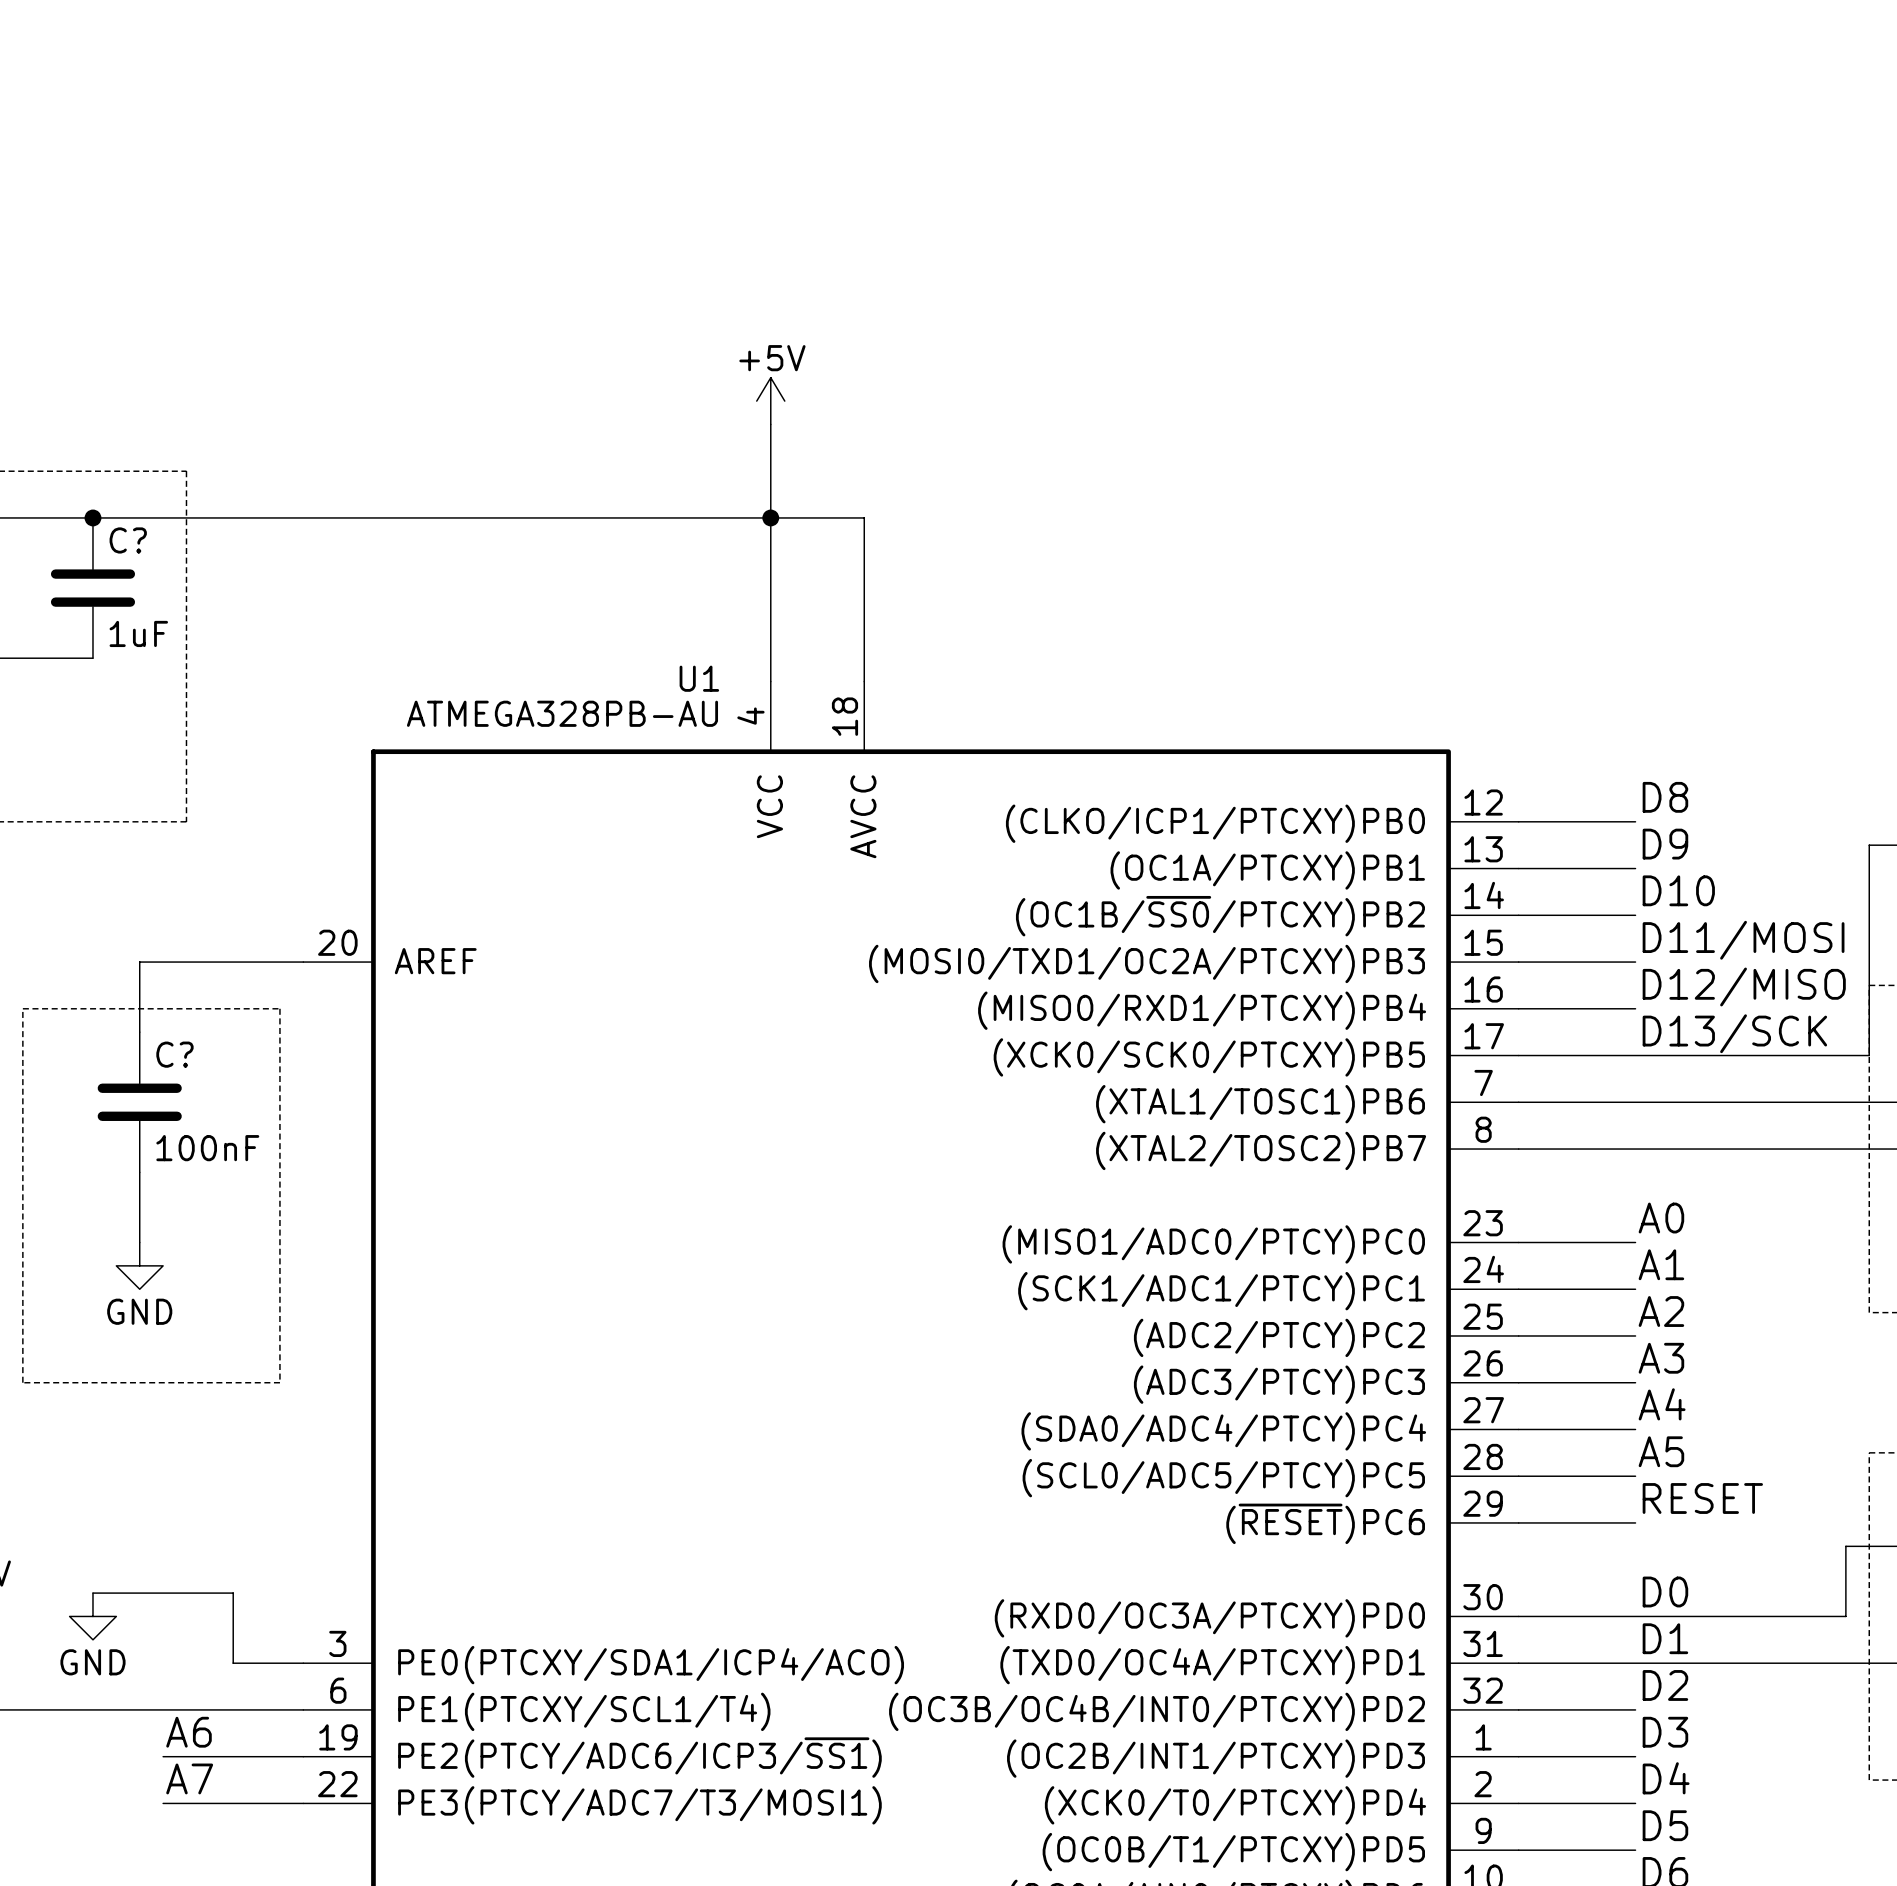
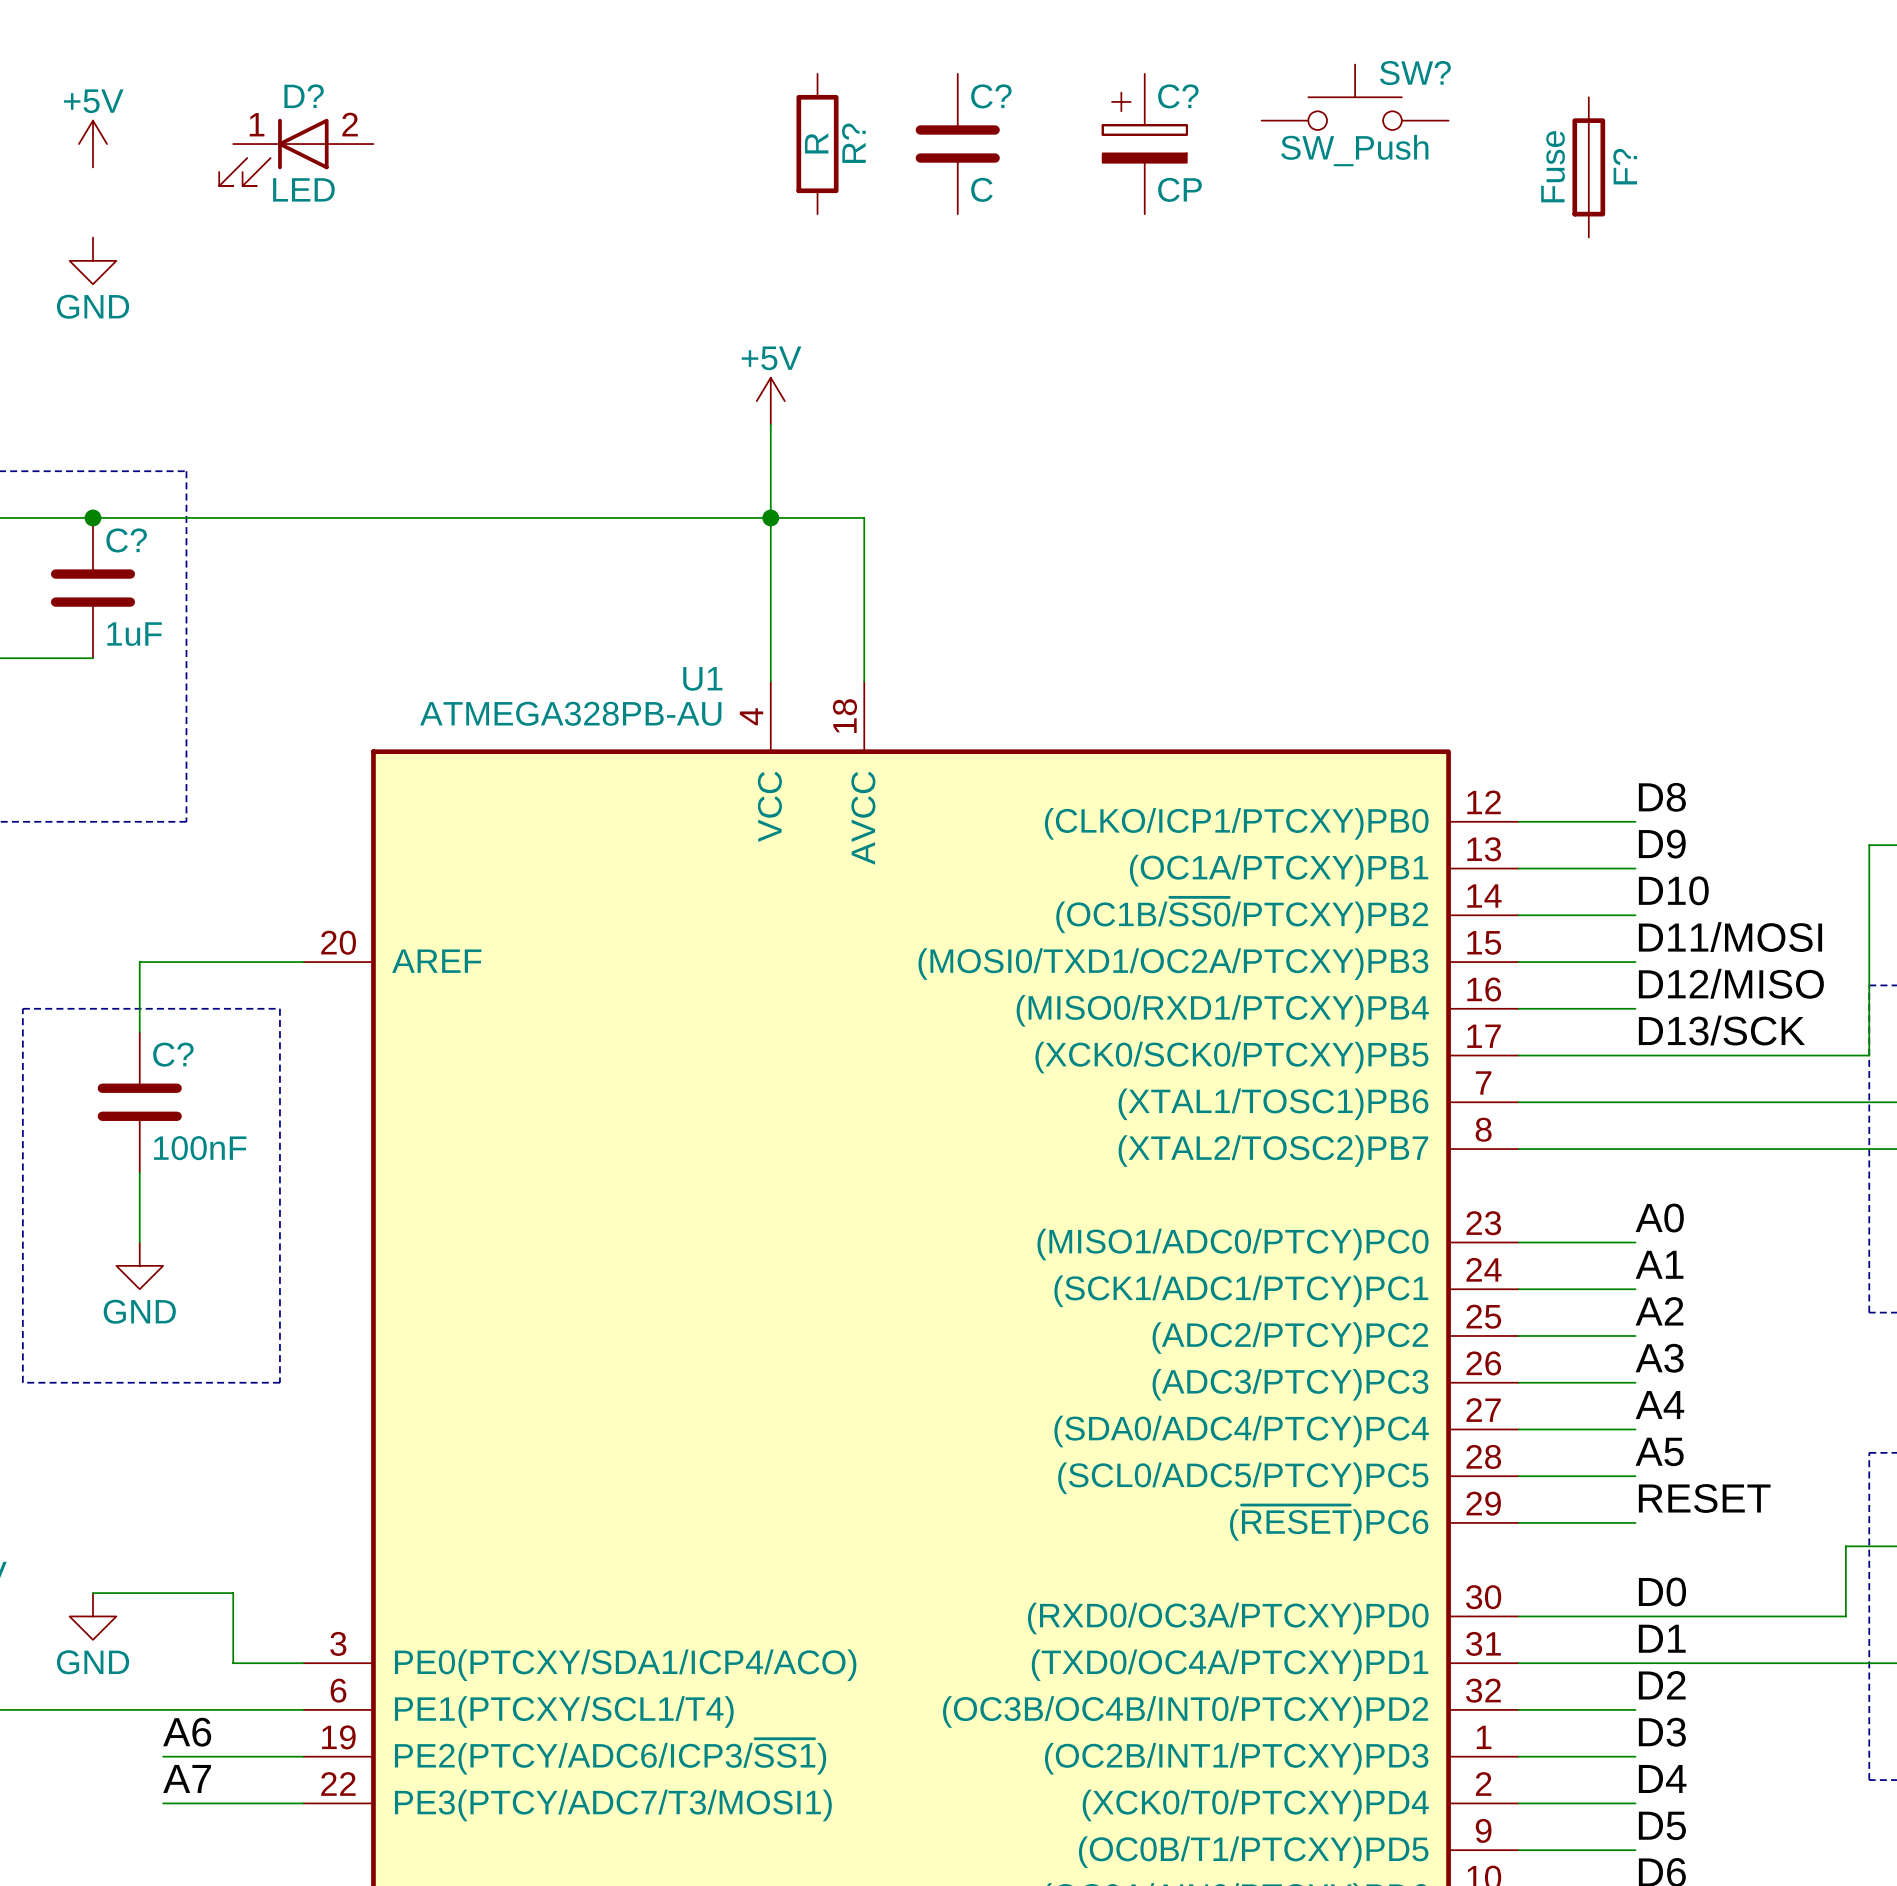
SW?: none -> SW_Push (1355, 97)
power symbol: none -> +5V (92, 144)
R?: none -> R (817, 144)
C?: none -> C (957, 144)
C?: none -> CP (1144, 144)
D?: none -> LED (296, 152)
F?: none -> Fuse (1588, 167)
power symbol: none -> GND (92, 260)

